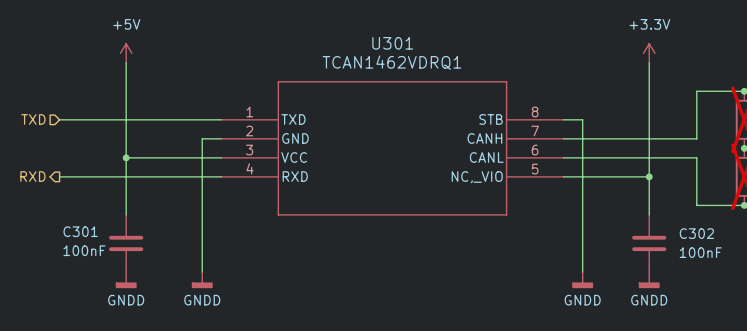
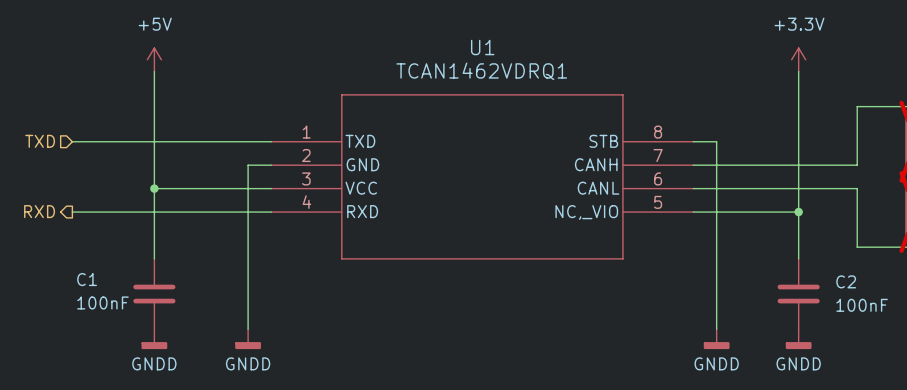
U301 name: U301 (392, 43) -> U1 (482, 47)
C301 name: C301 (80, 231) -> C1 (87, 279)
C302 name: C302 (696, 233) -> C2 (846, 281)

